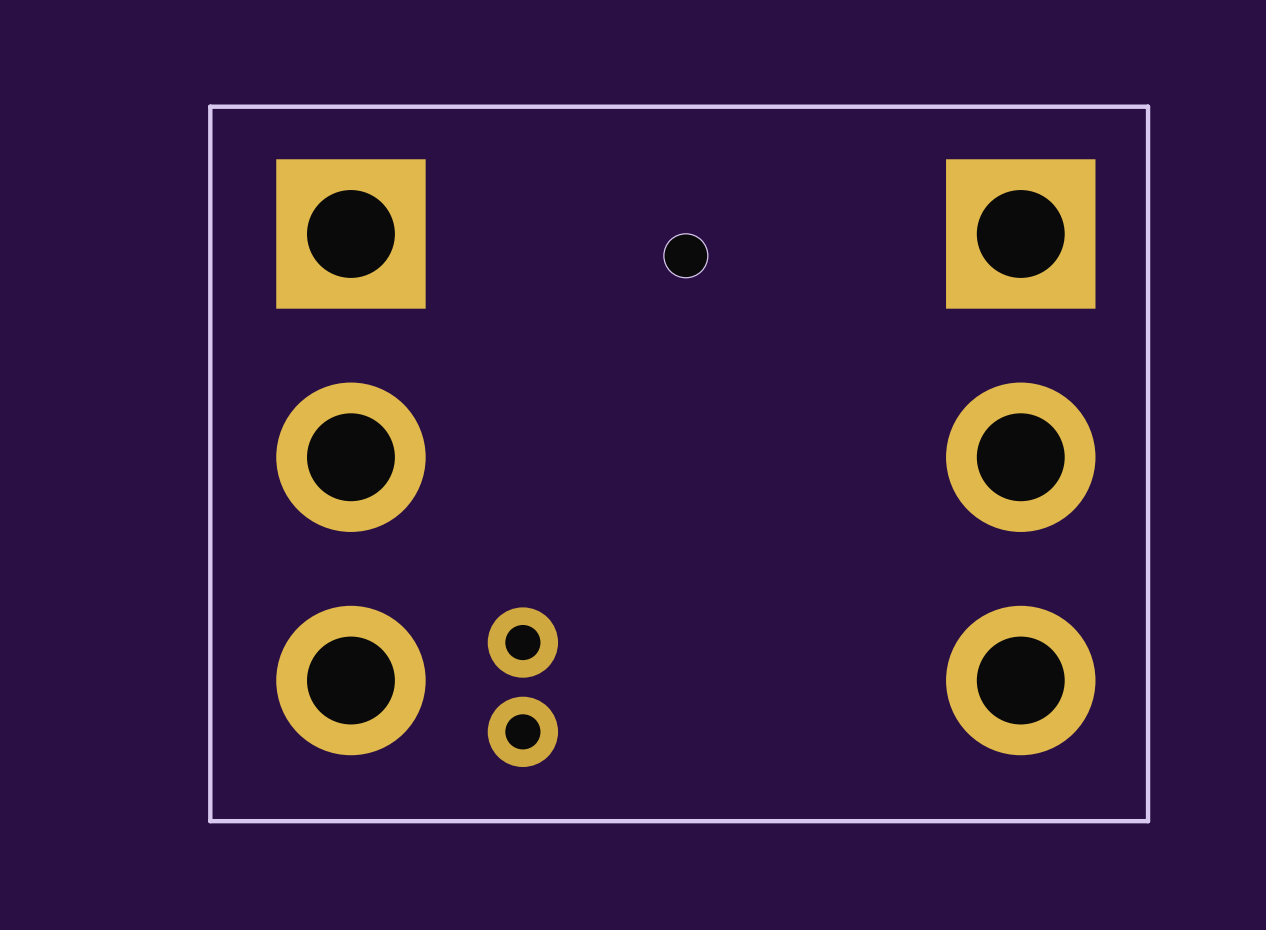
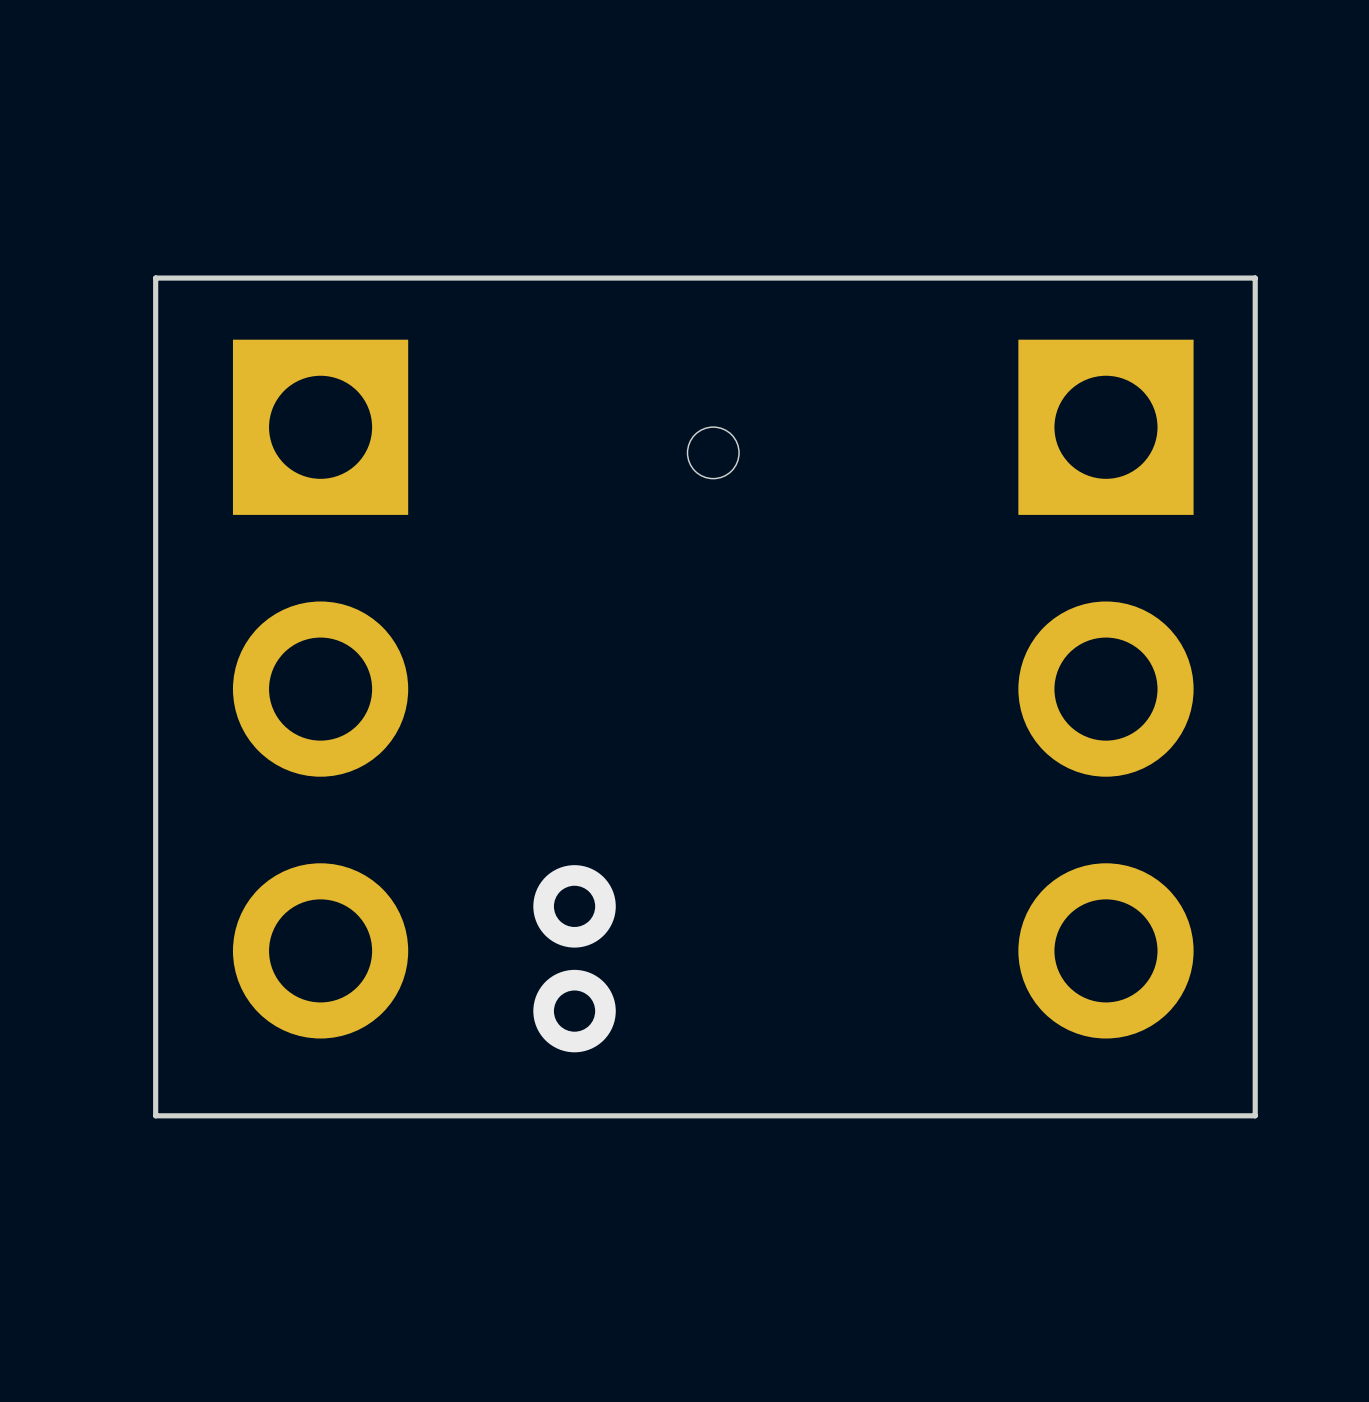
via position: (522, 642) -> (574, 906)
via position: (522, 731) -> (574, 1011)

